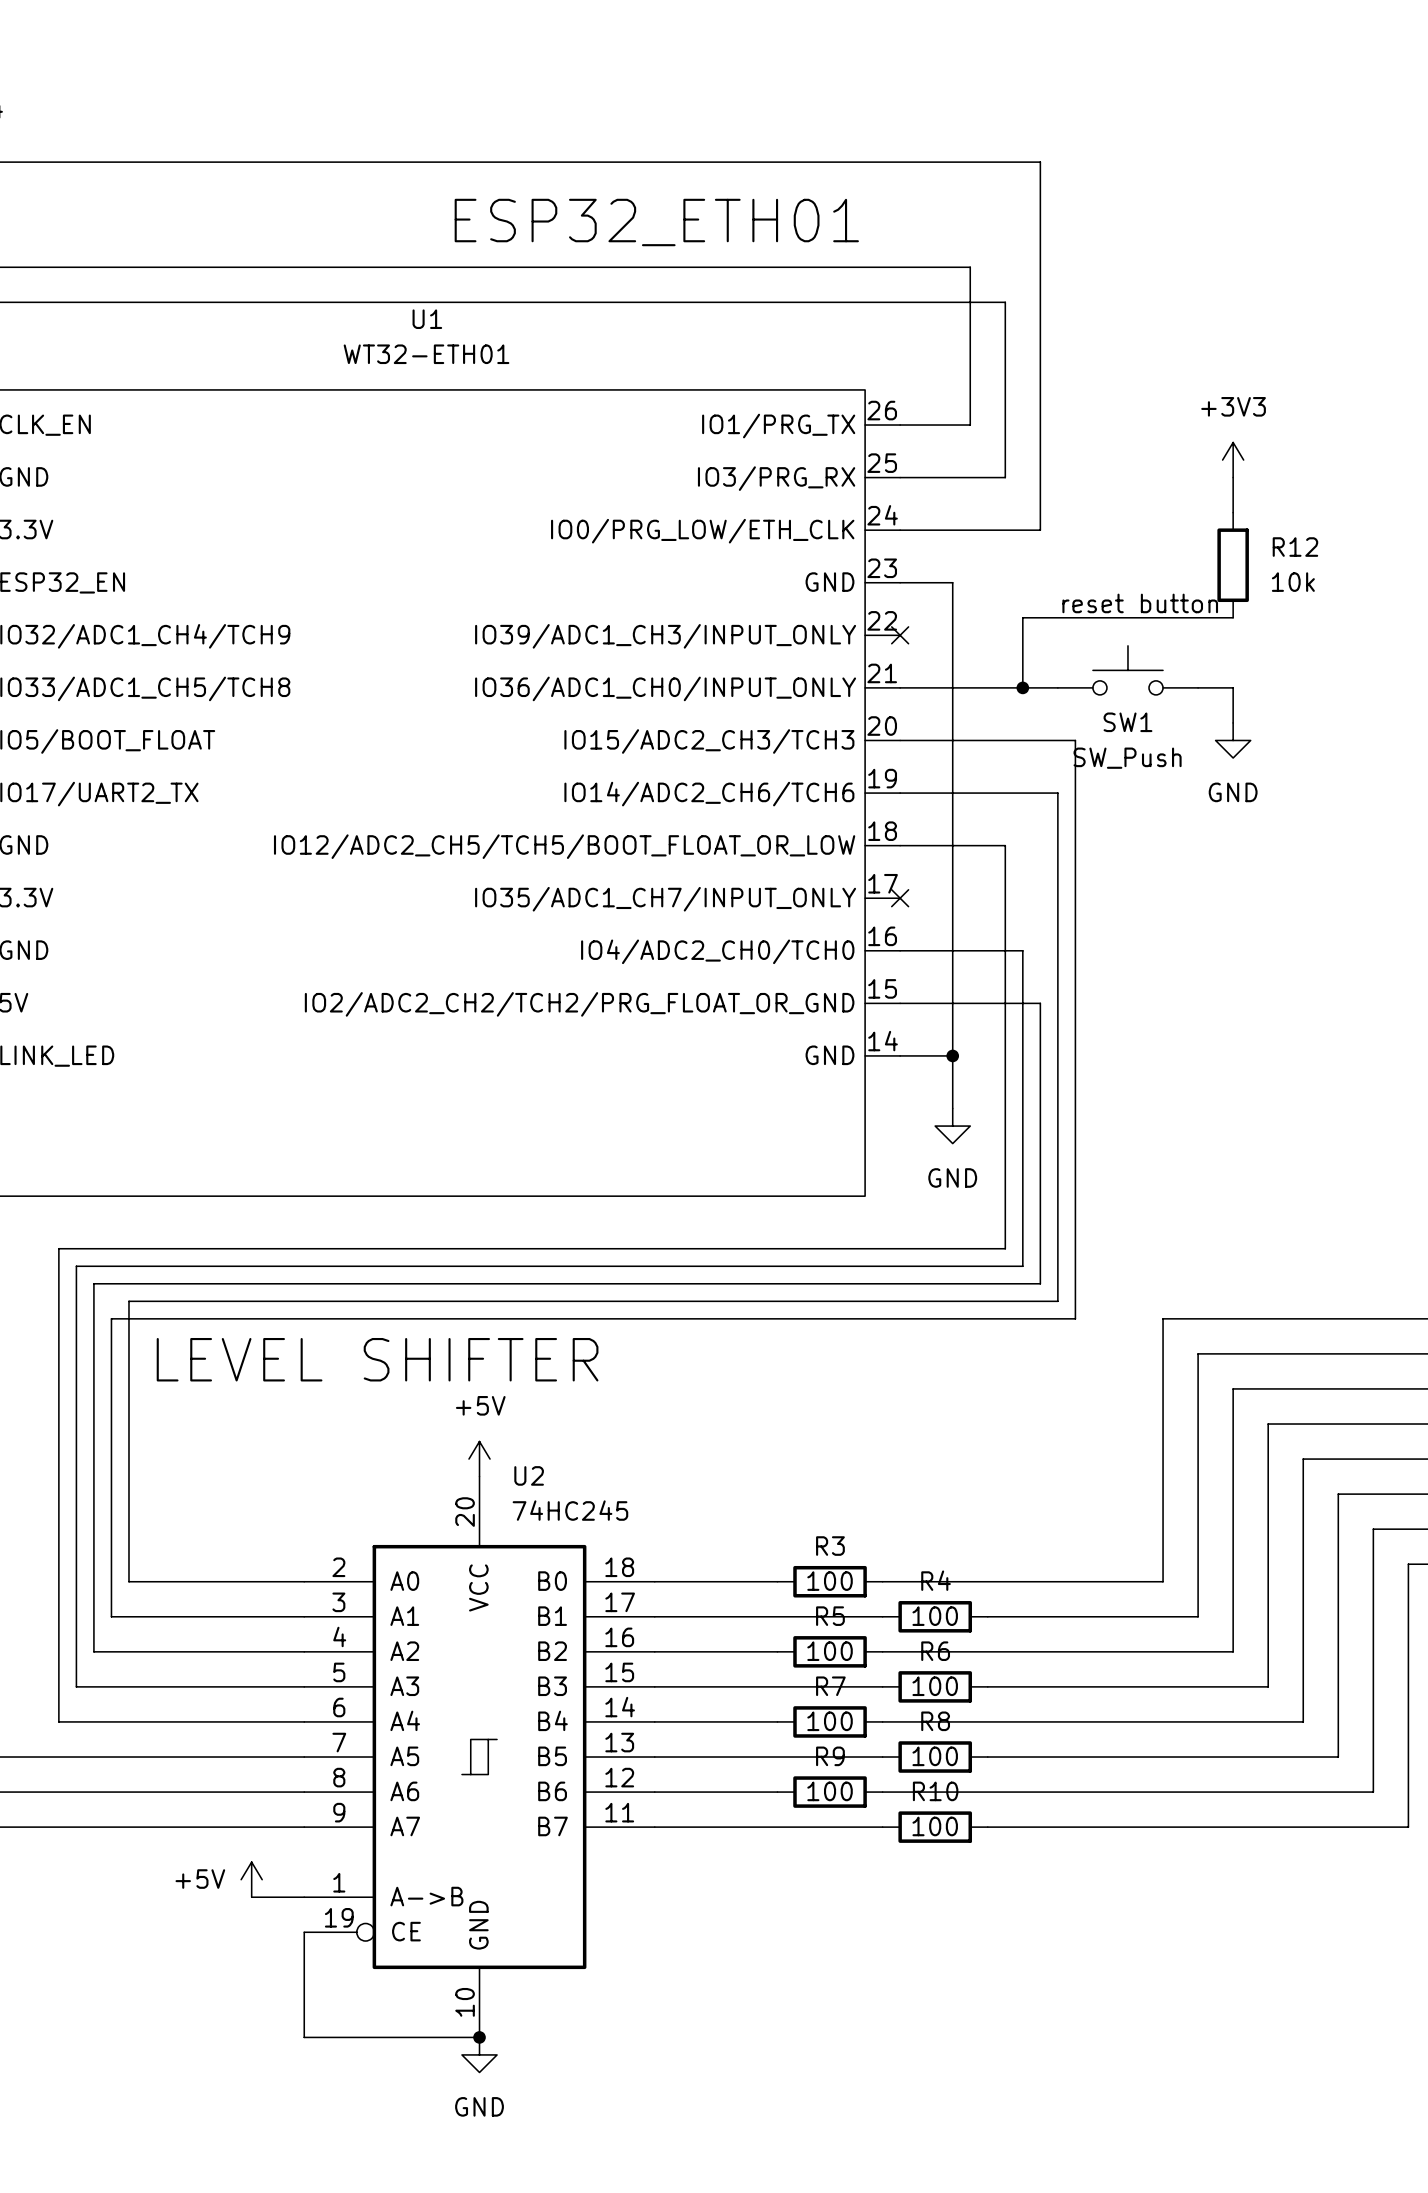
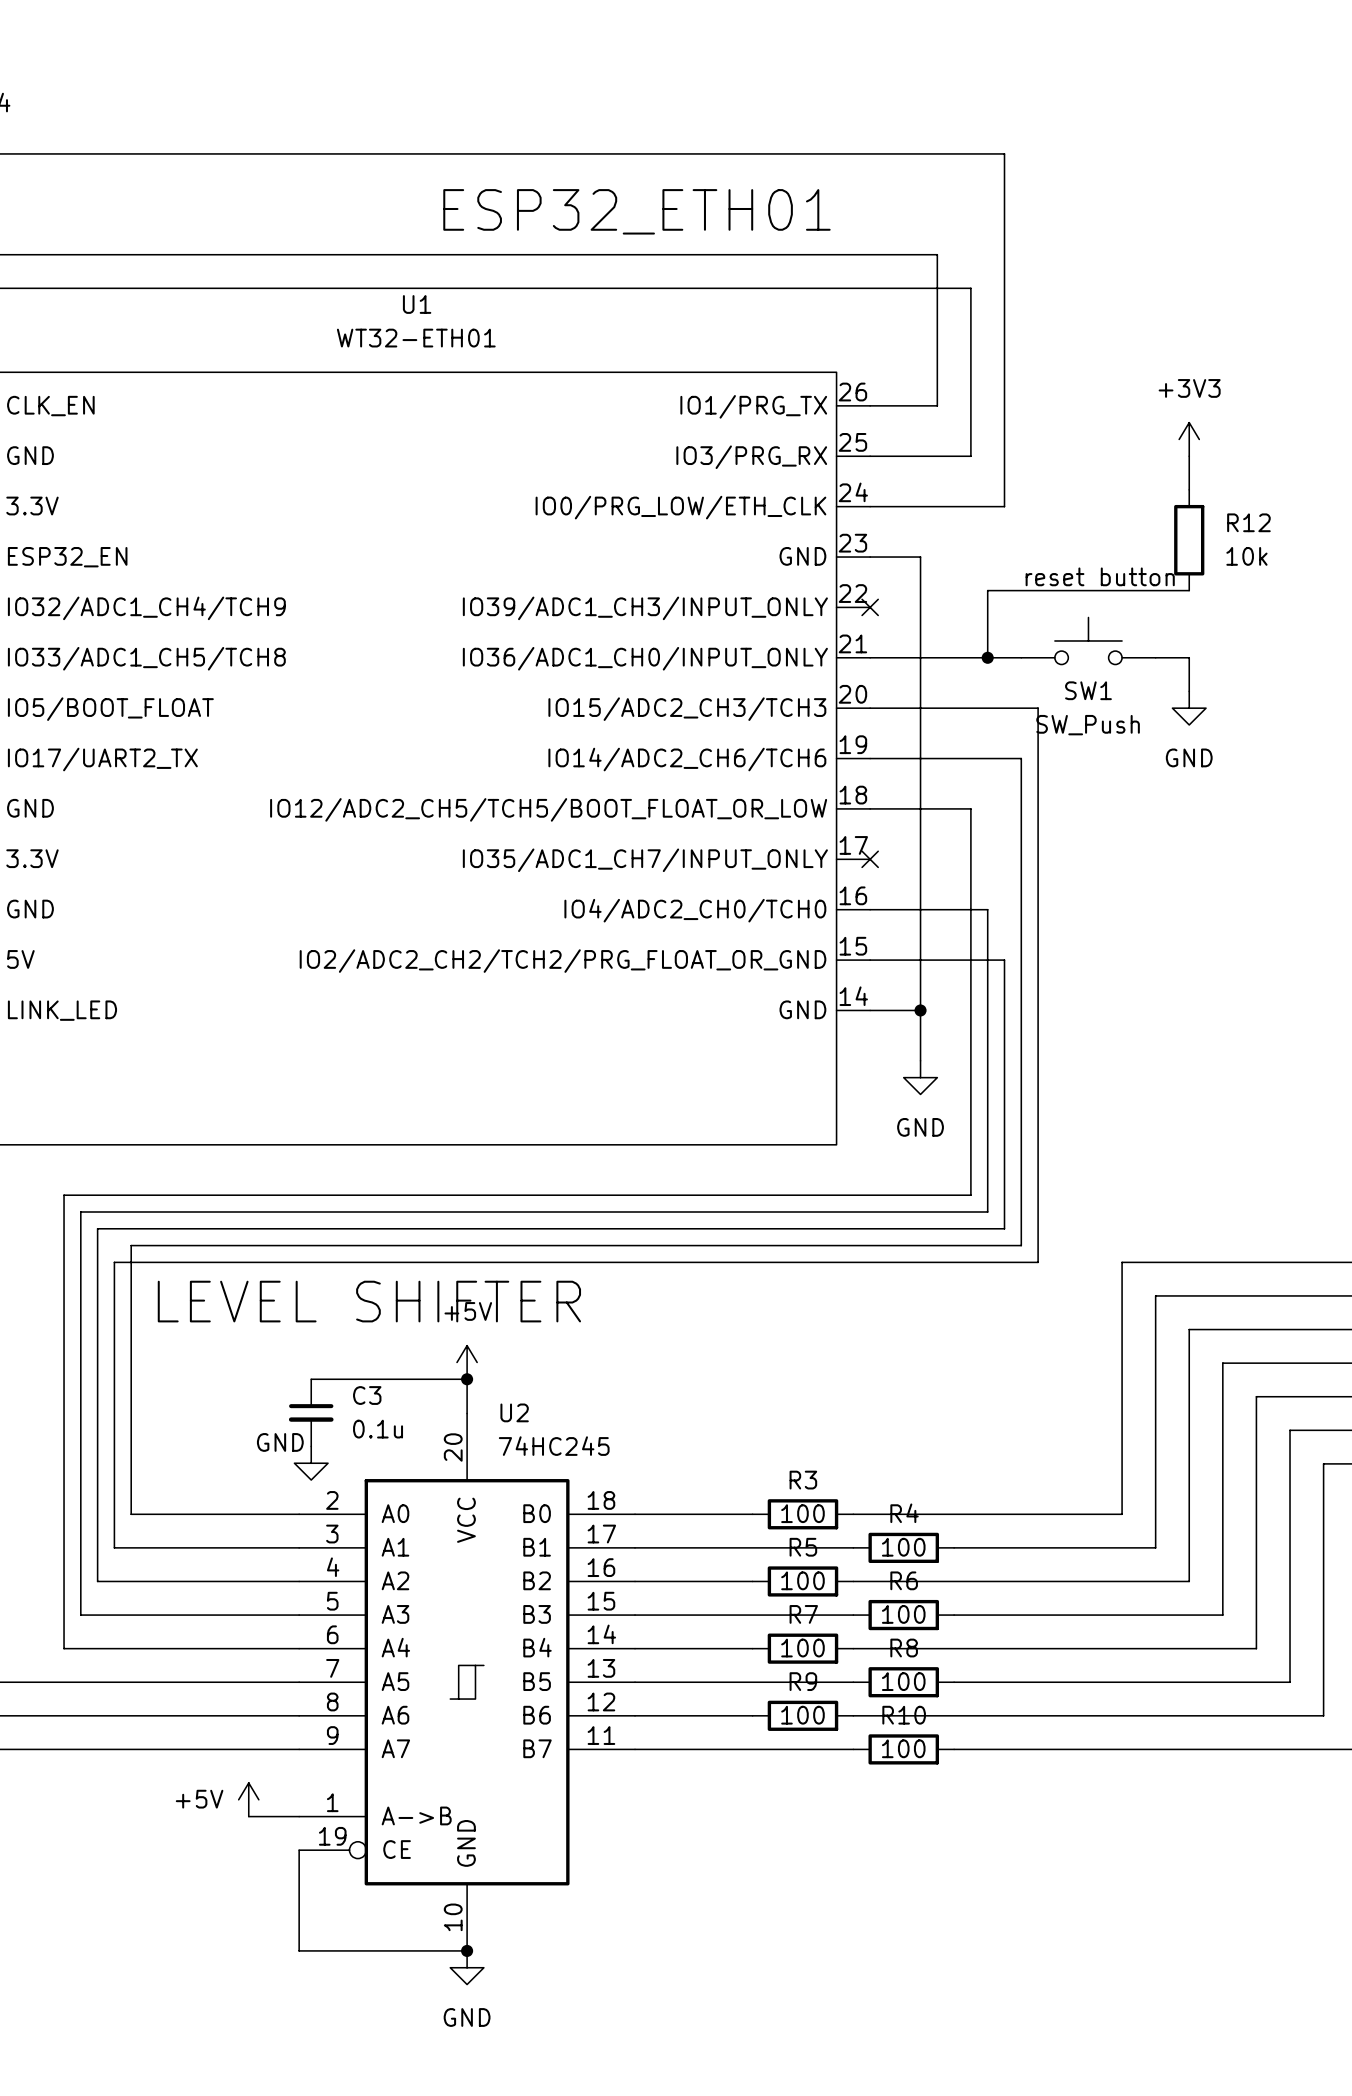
wire: none -> (311, 1379) (467, 1379) (467, 1413)
junction: none -> (467, 1379)
power symbol position: +5V (479, 1459) -> +5V (467, 1362)
C3: none -> 0.1u (311, 1412)
power symbol: none -> GND (311, 1463)

